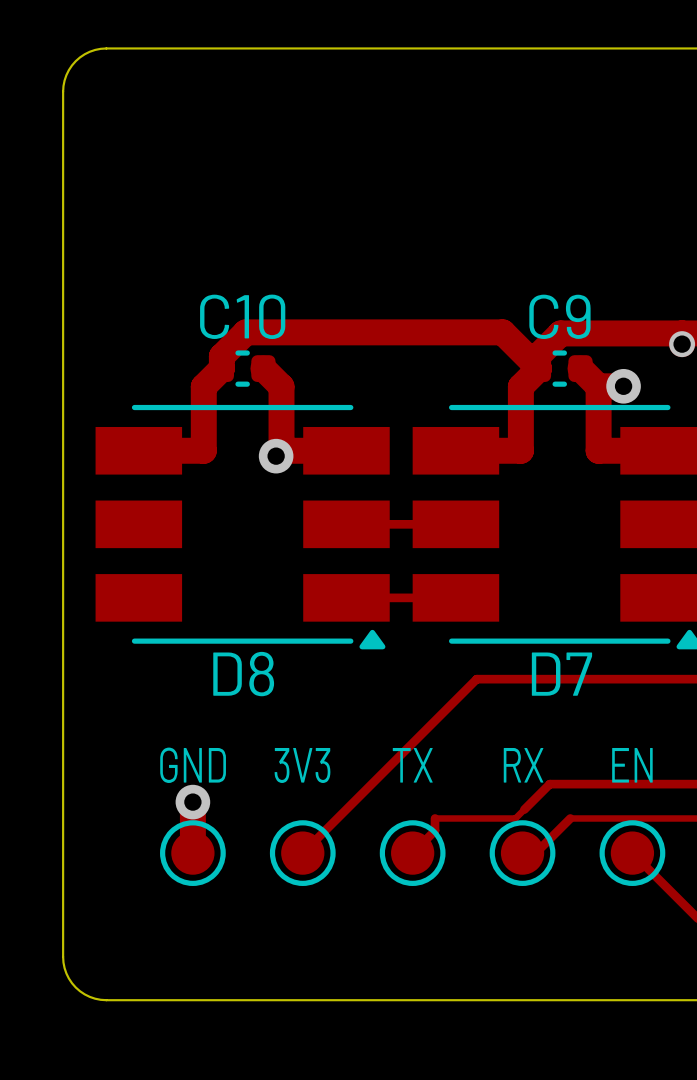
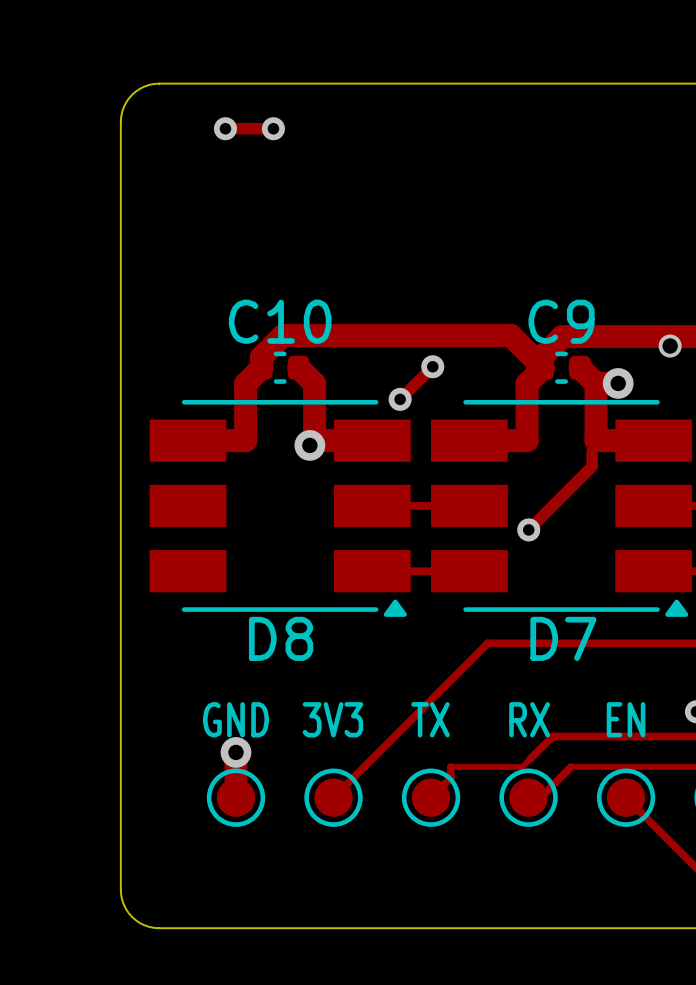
track: none -> (225, 128) (273, 128)
via: none -> (225, 128)
via: none -> (273, 128)
track: none -> (432, 366) (400, 399)
via: none -> (432, 366)
via: none -> (400, 399)
track: none -> (592, 451) (592, 466) (528, 529)
via: none -> (528, 529)

